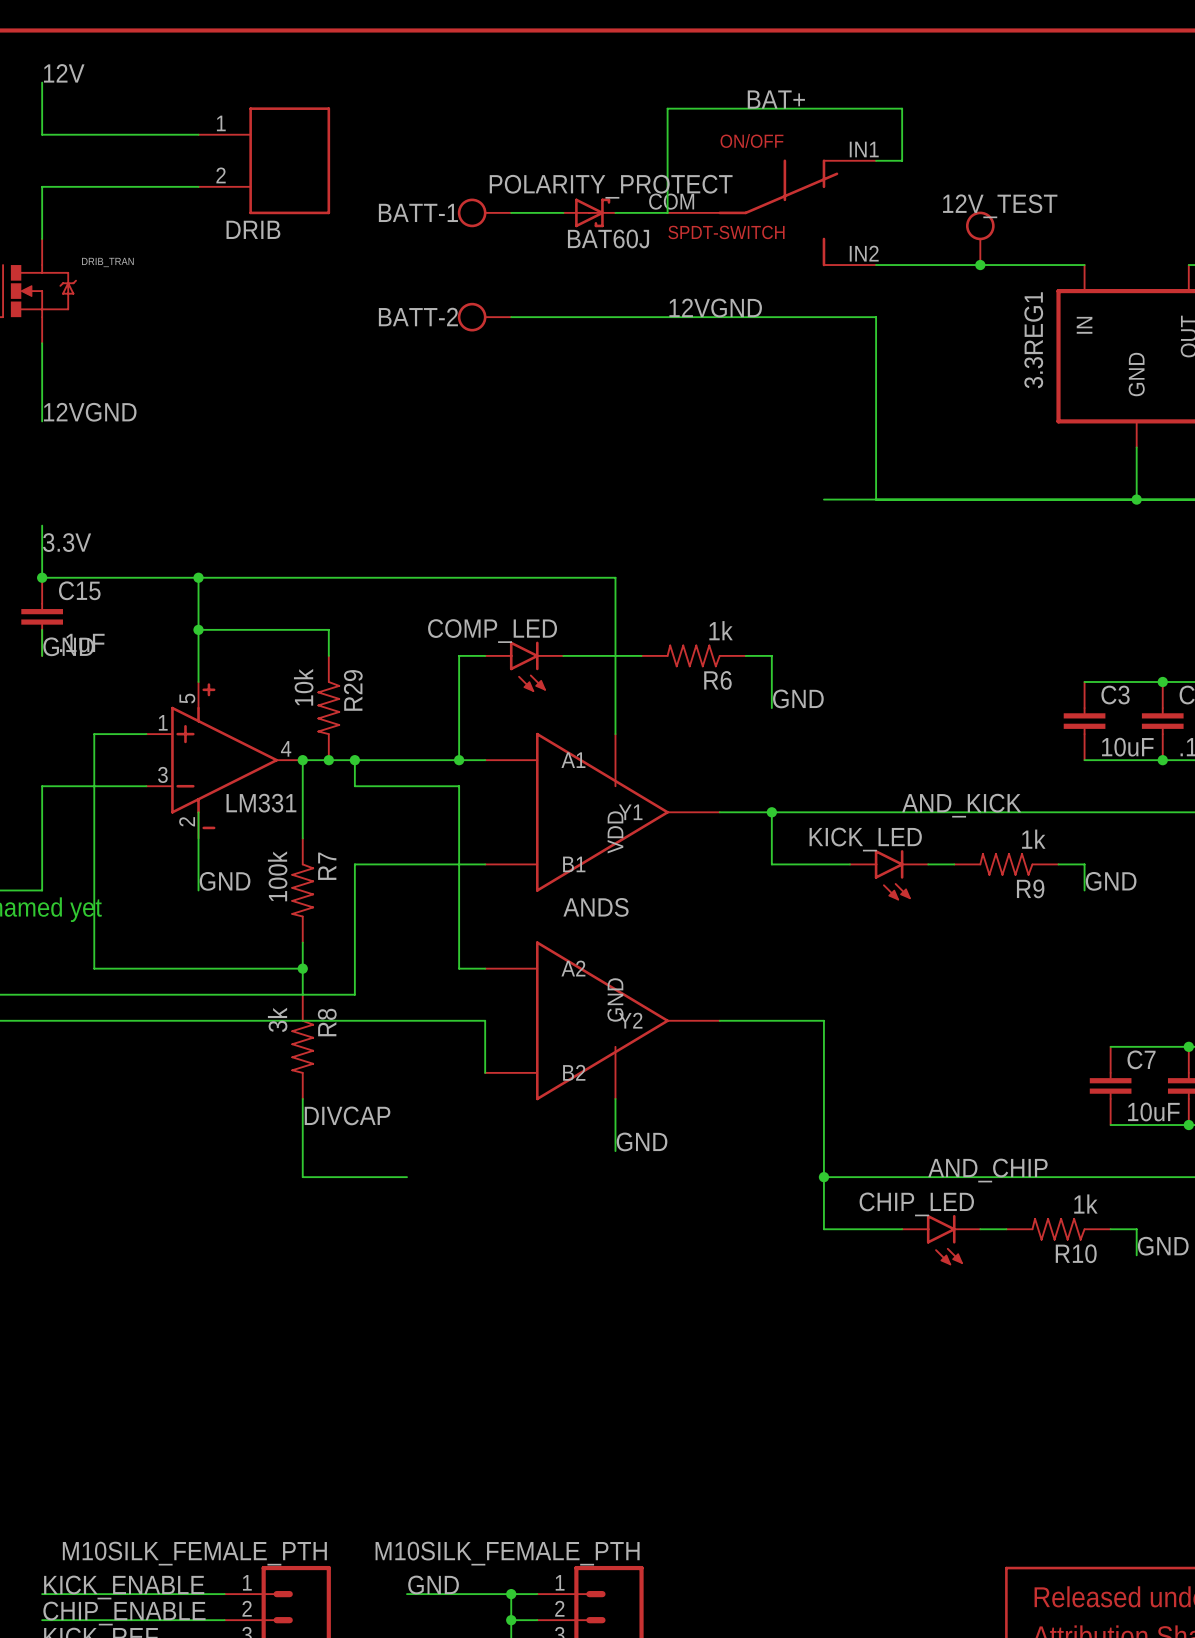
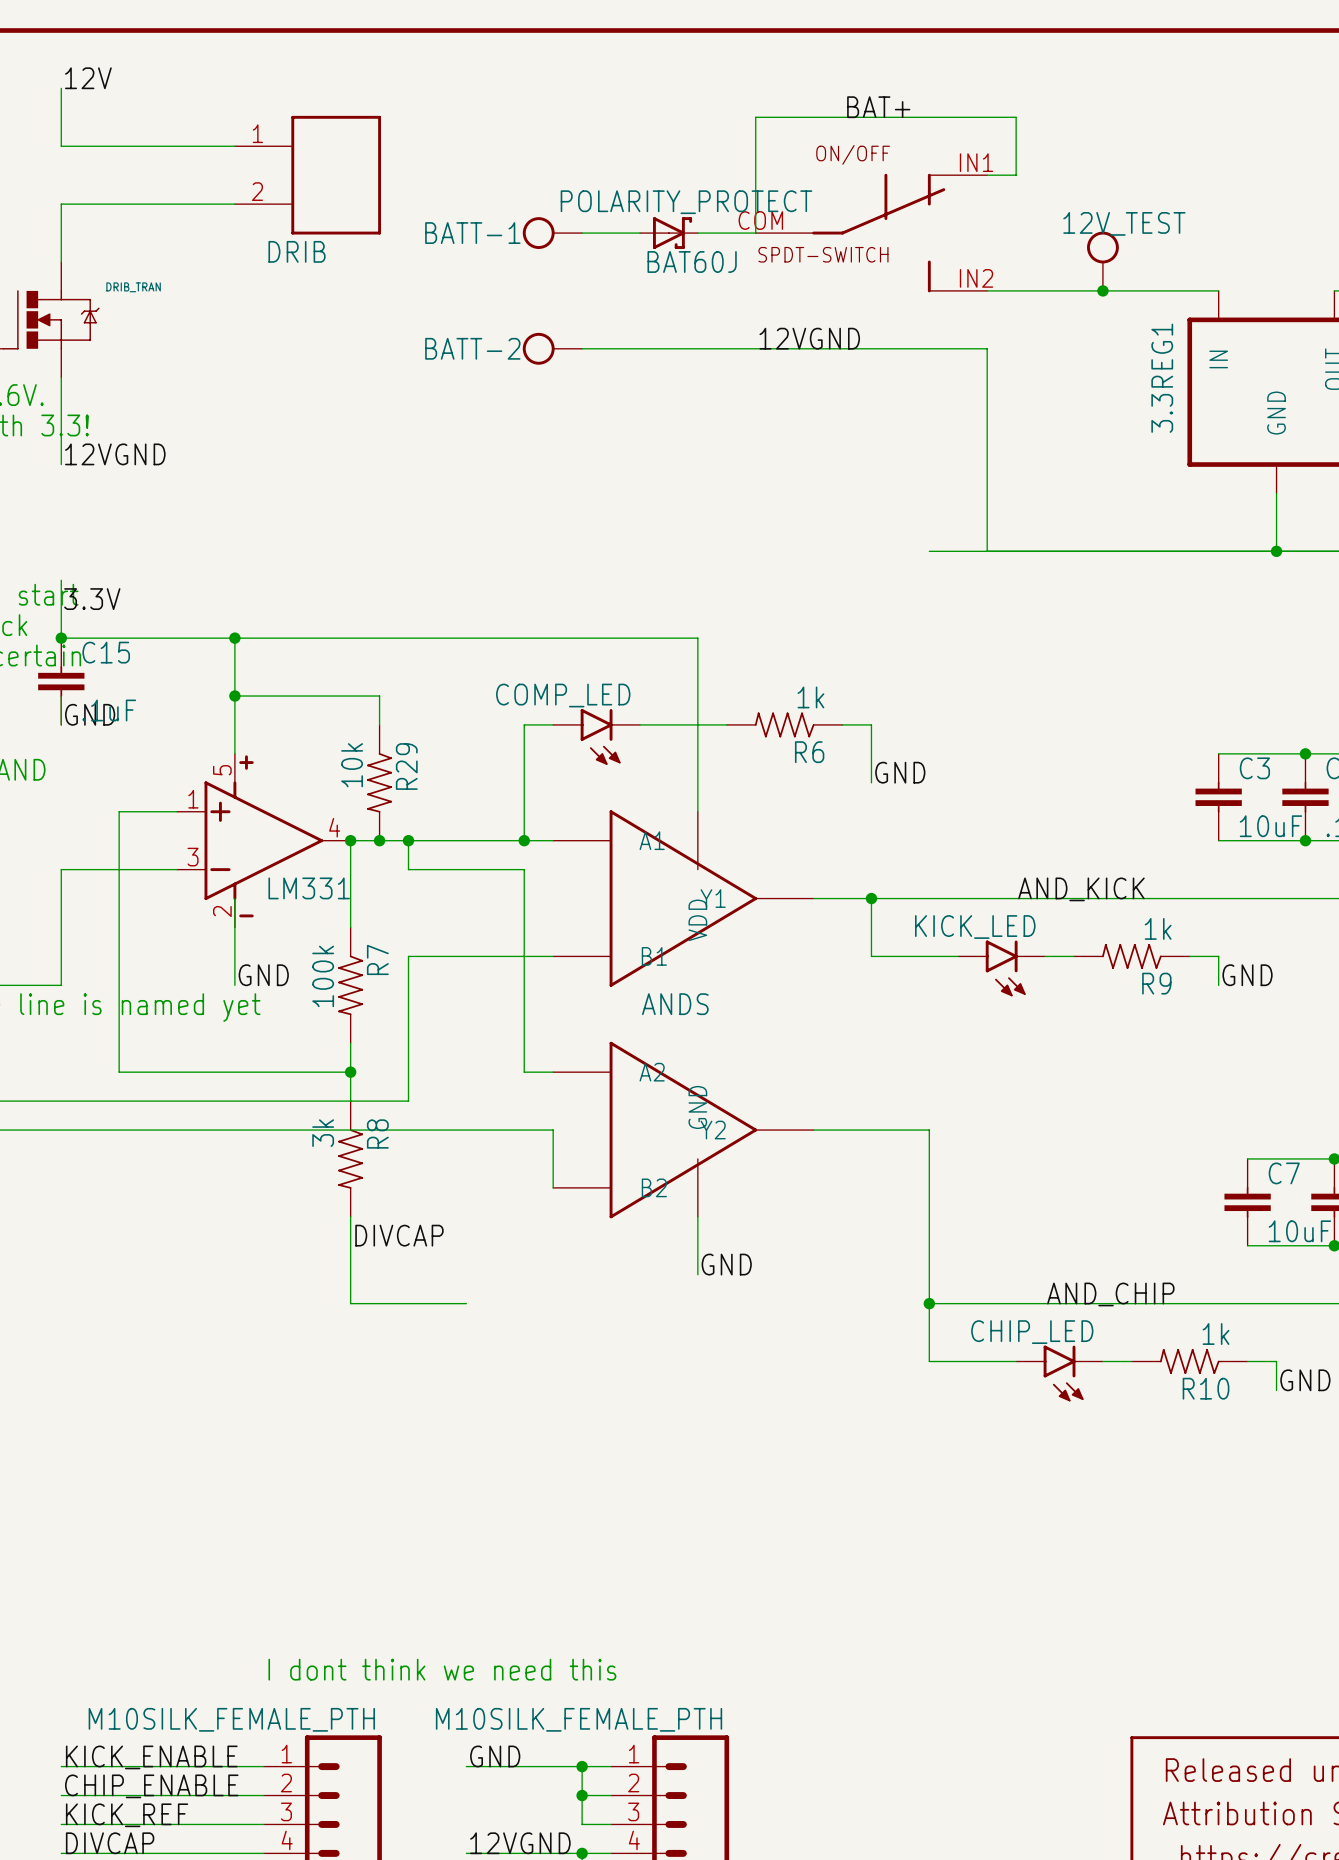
text: none -> I dont think we need this (442, 1669)

